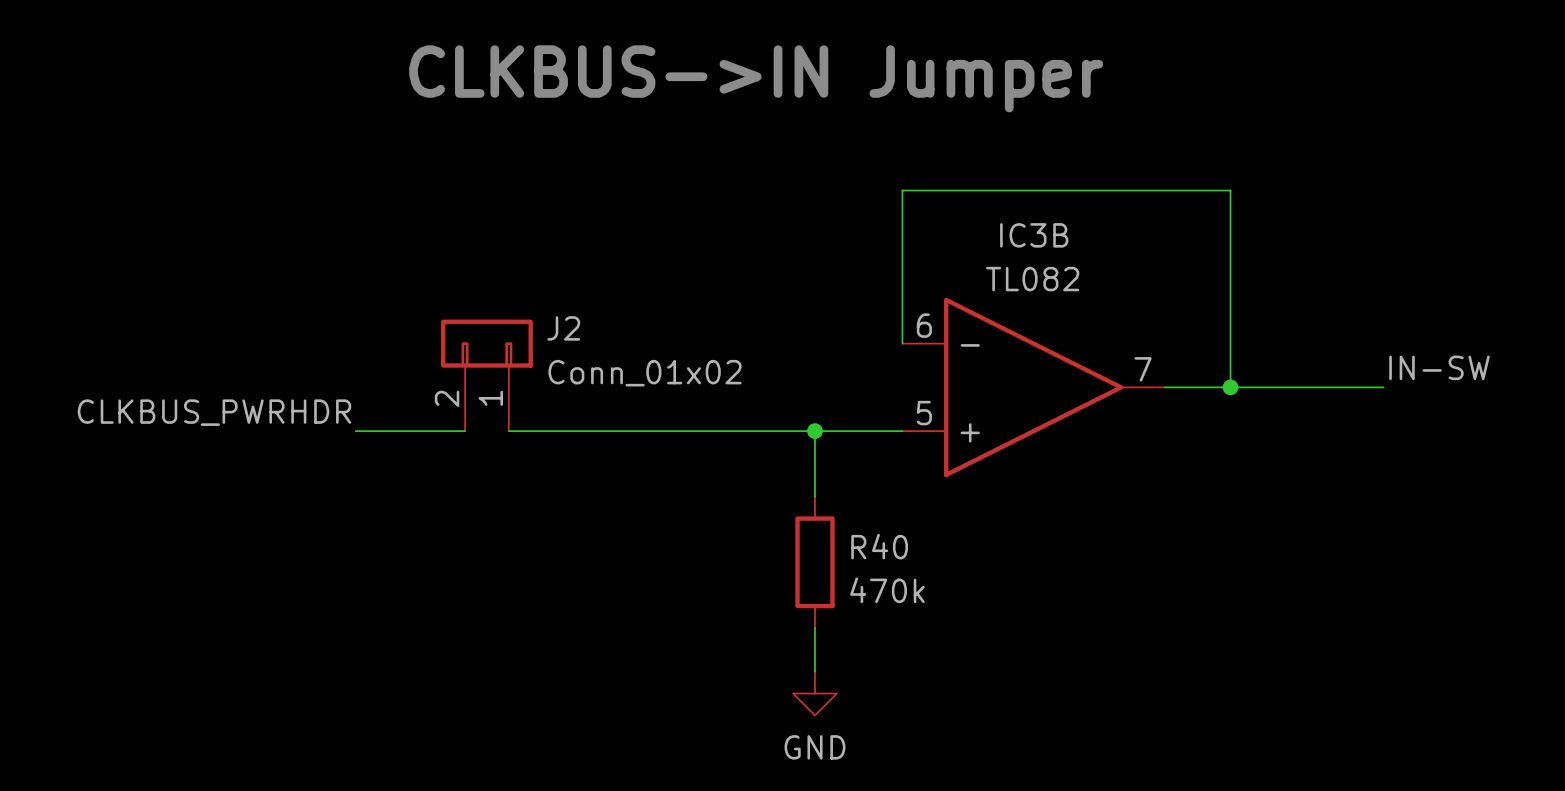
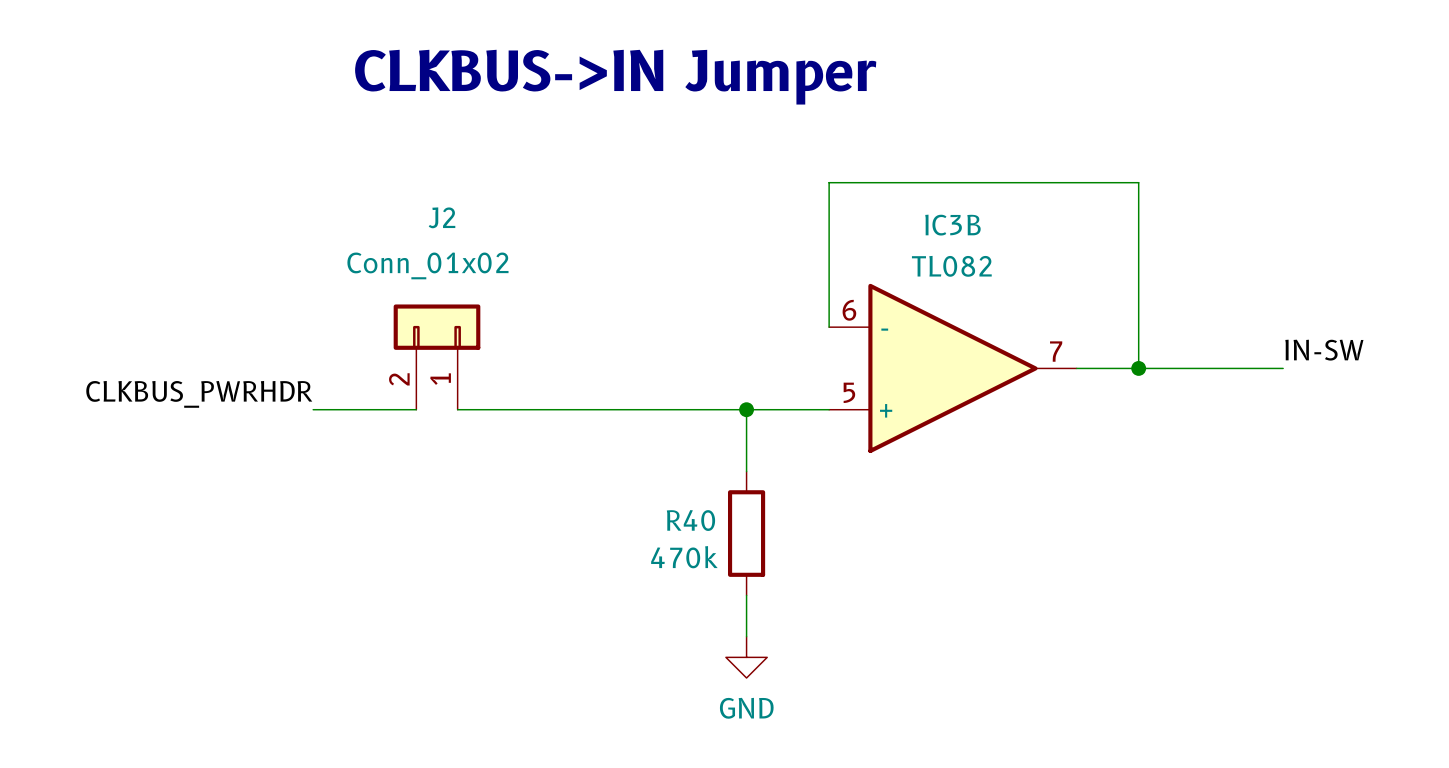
J2 name position: J2 (563, 328) -> J2 (442, 217)
J2 value position: Conn_01x02 (645, 373) -> Conn_01x02 (427, 265)
R40 name position: R40 (879, 546) -> R40 (690, 520)
R40 text position: 470k (887, 590) -> 470k (684, 557)

